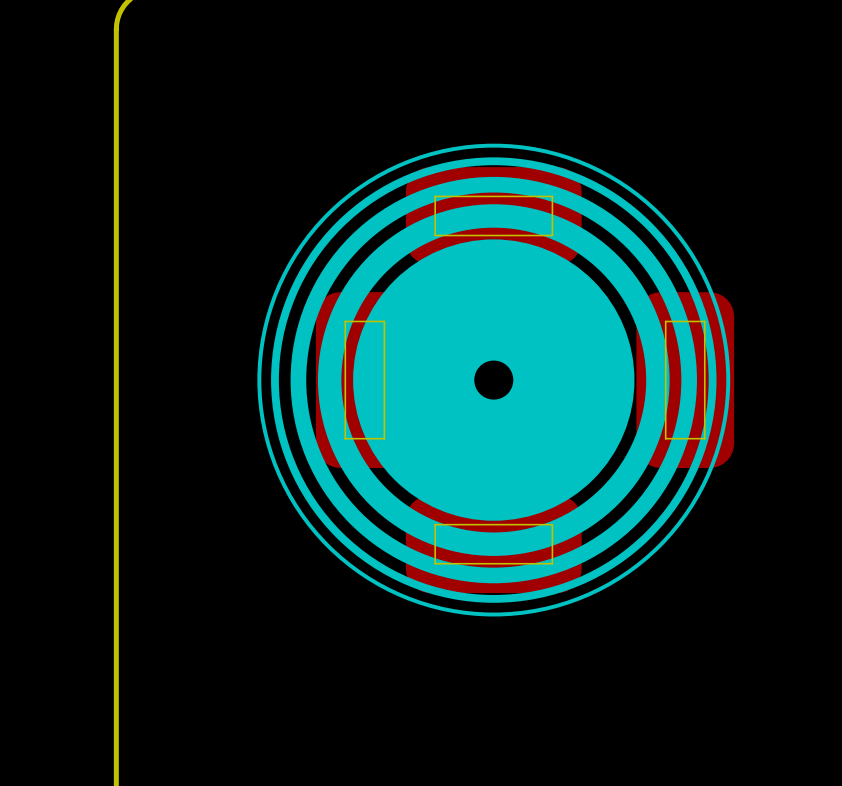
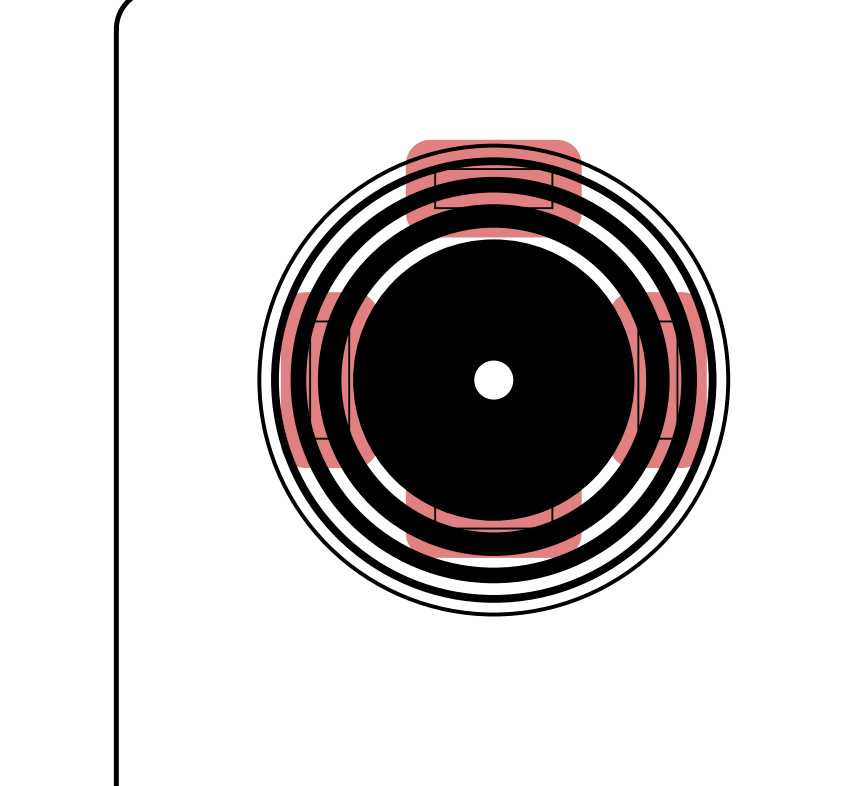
part rotation: 0° (495, 380) -> 90° counterclockwise (493, 378)

